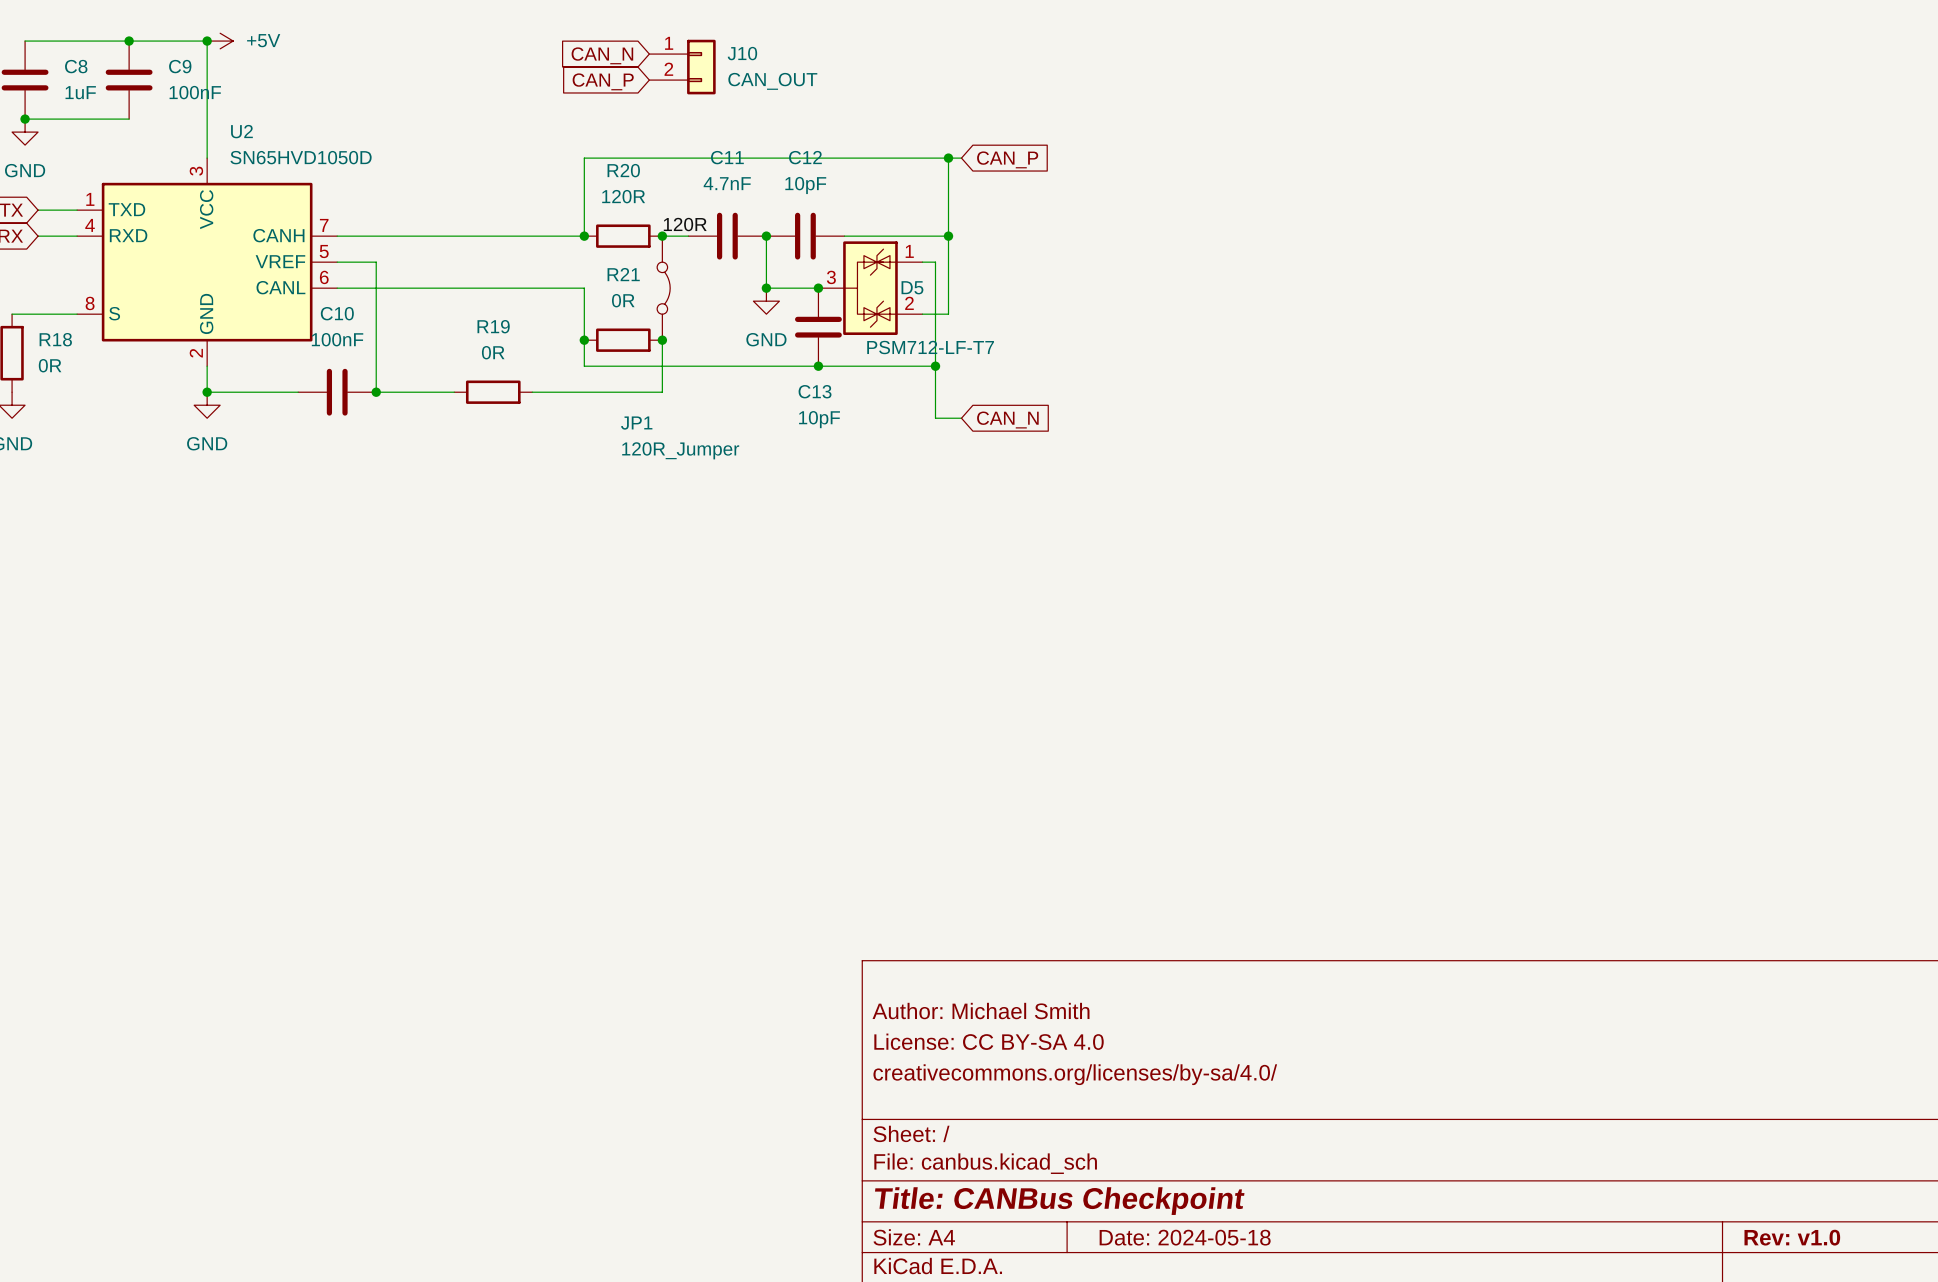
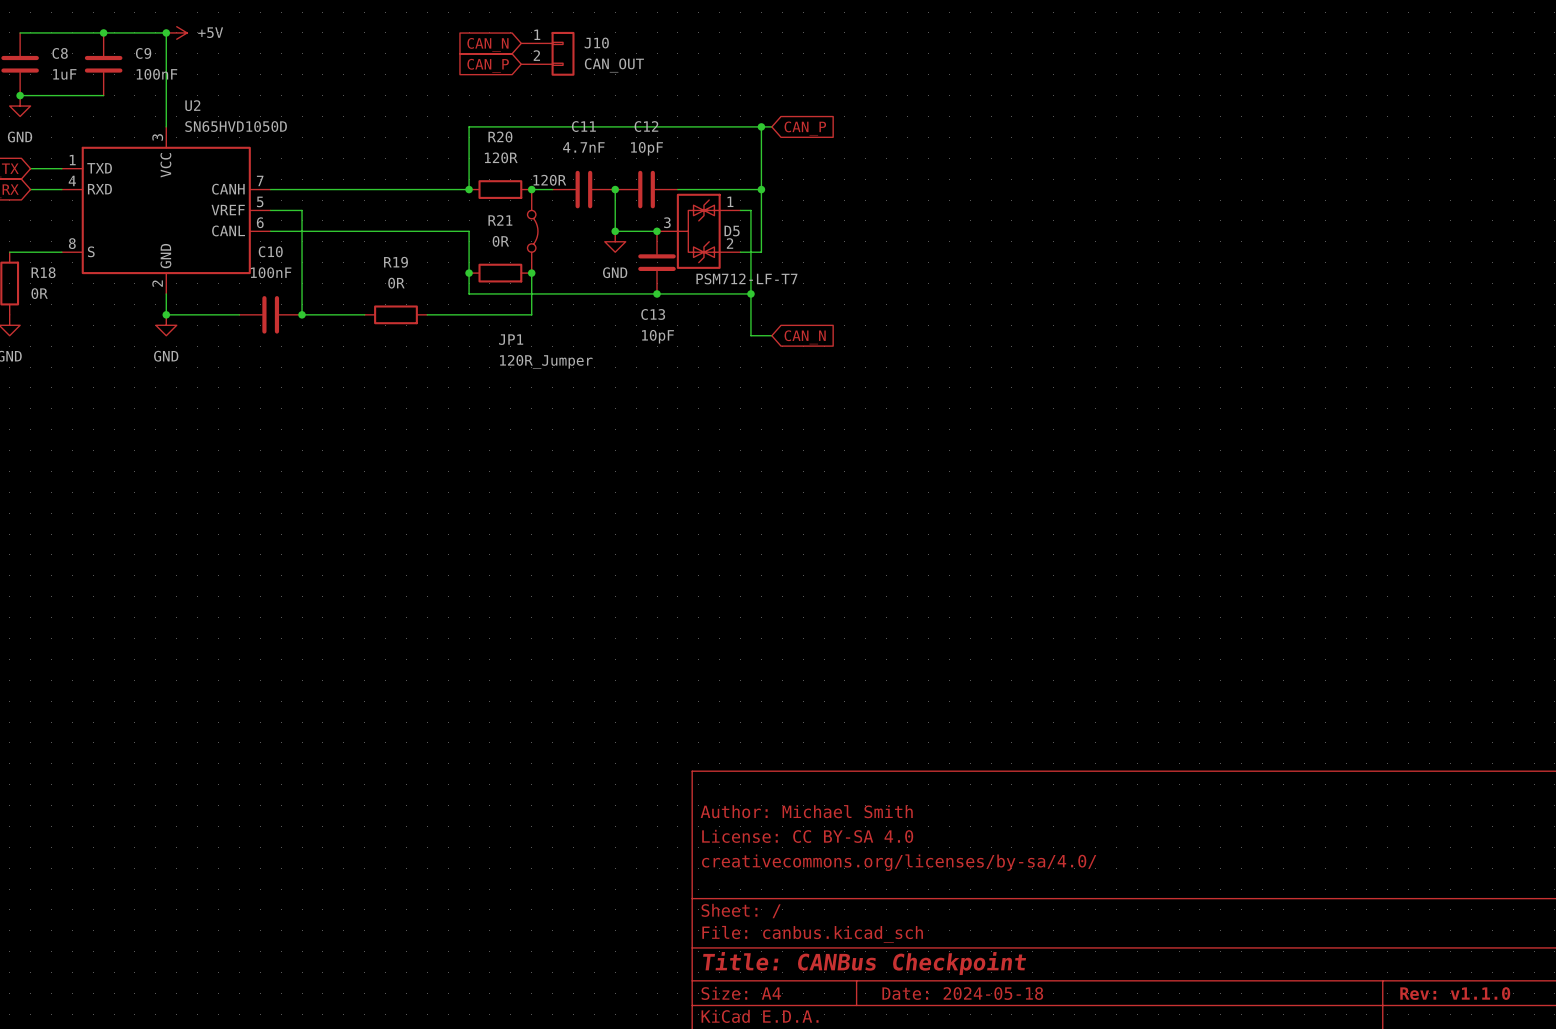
title block: Rev: v1.0 (1792, 1237) -> Rev: v1.1.0 (1455, 993)

